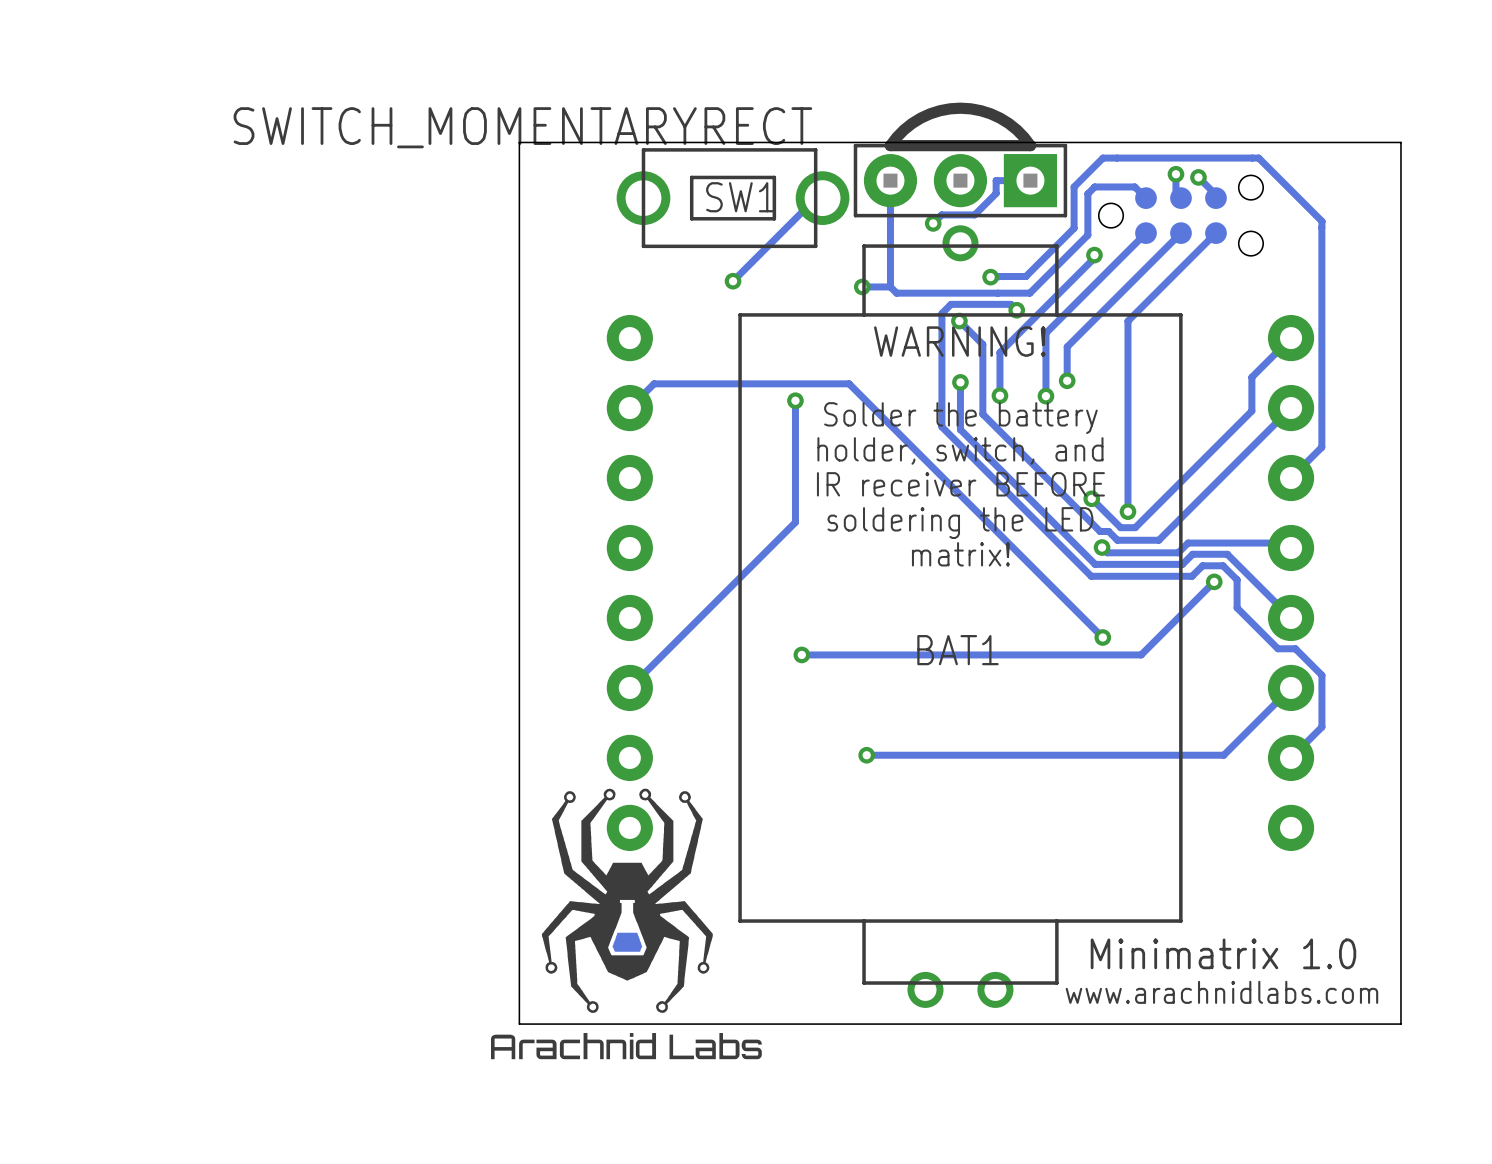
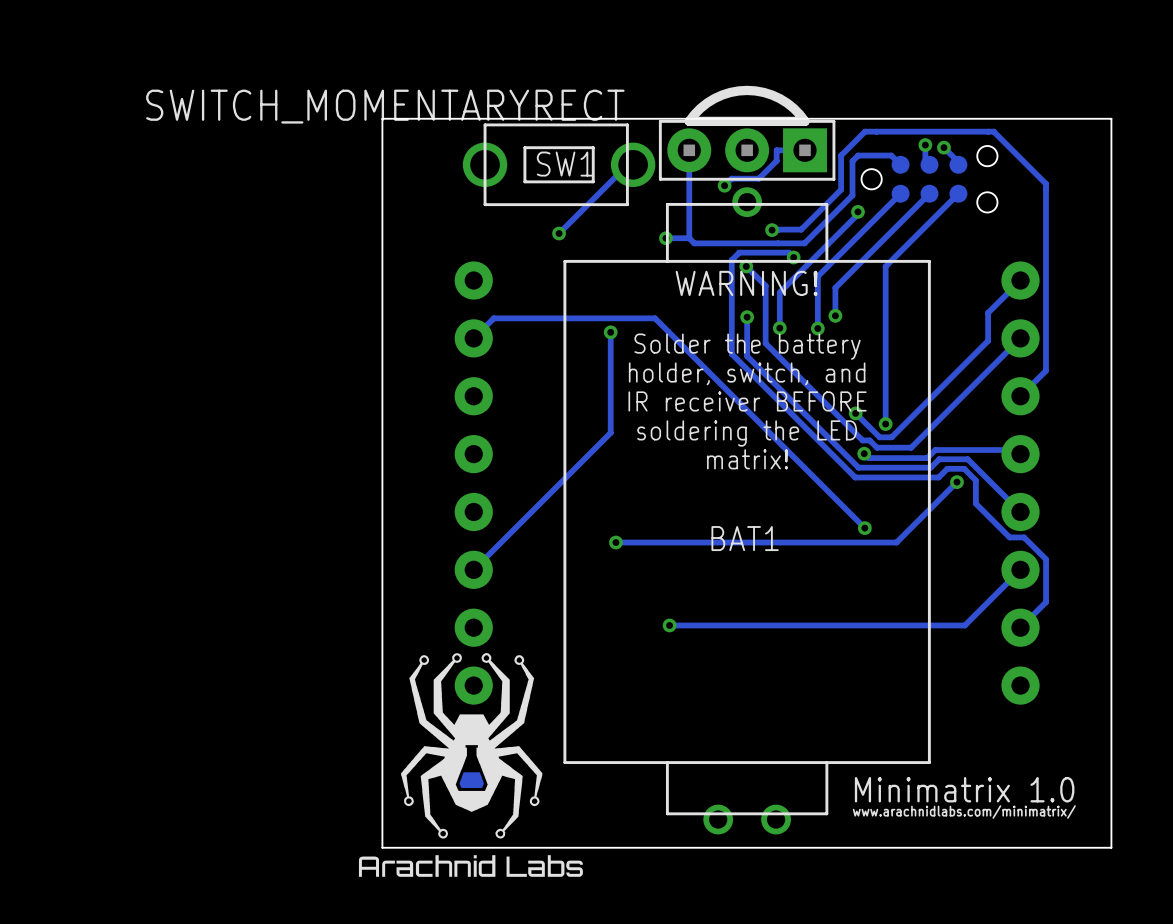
text: www.arachnidlabs.com (1221, 992) -> www.arachnidlabs.com/minimatrix/ (964, 812)

